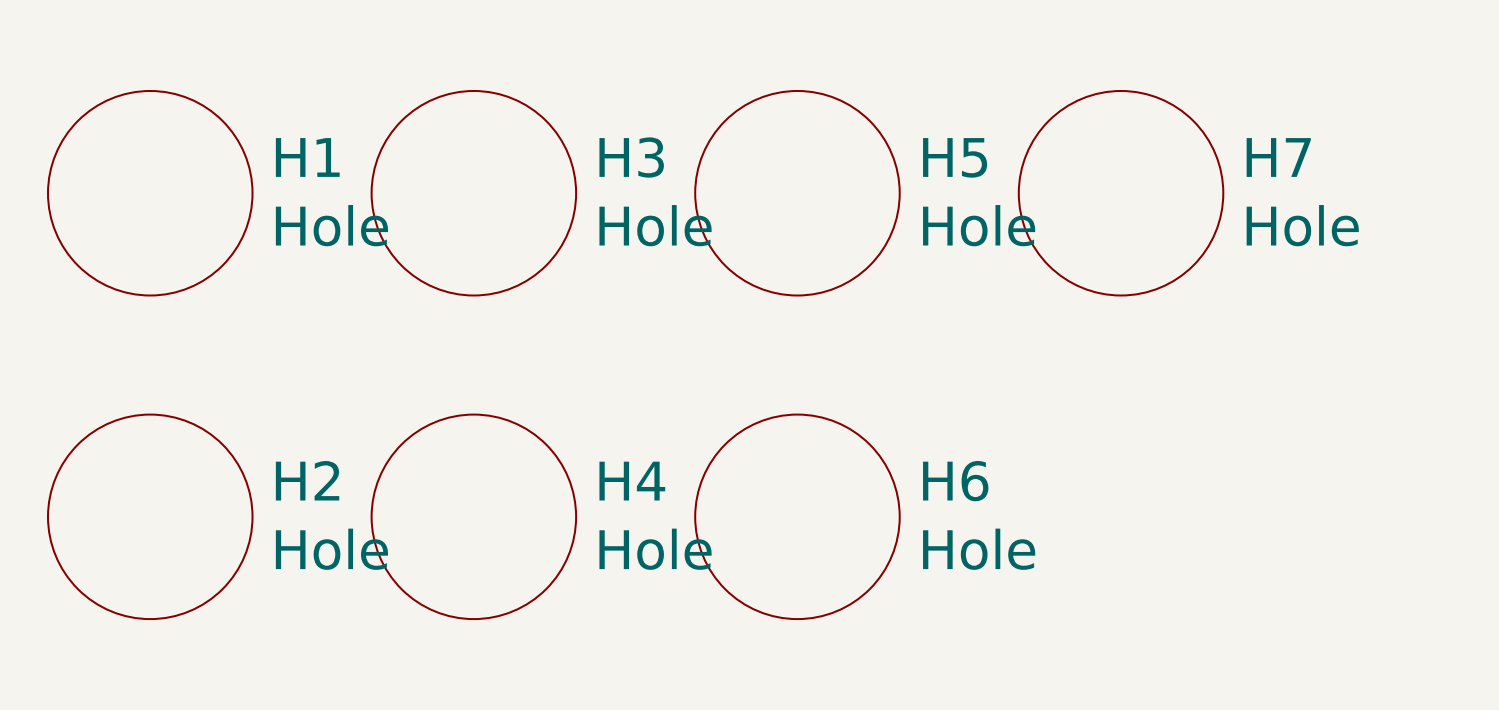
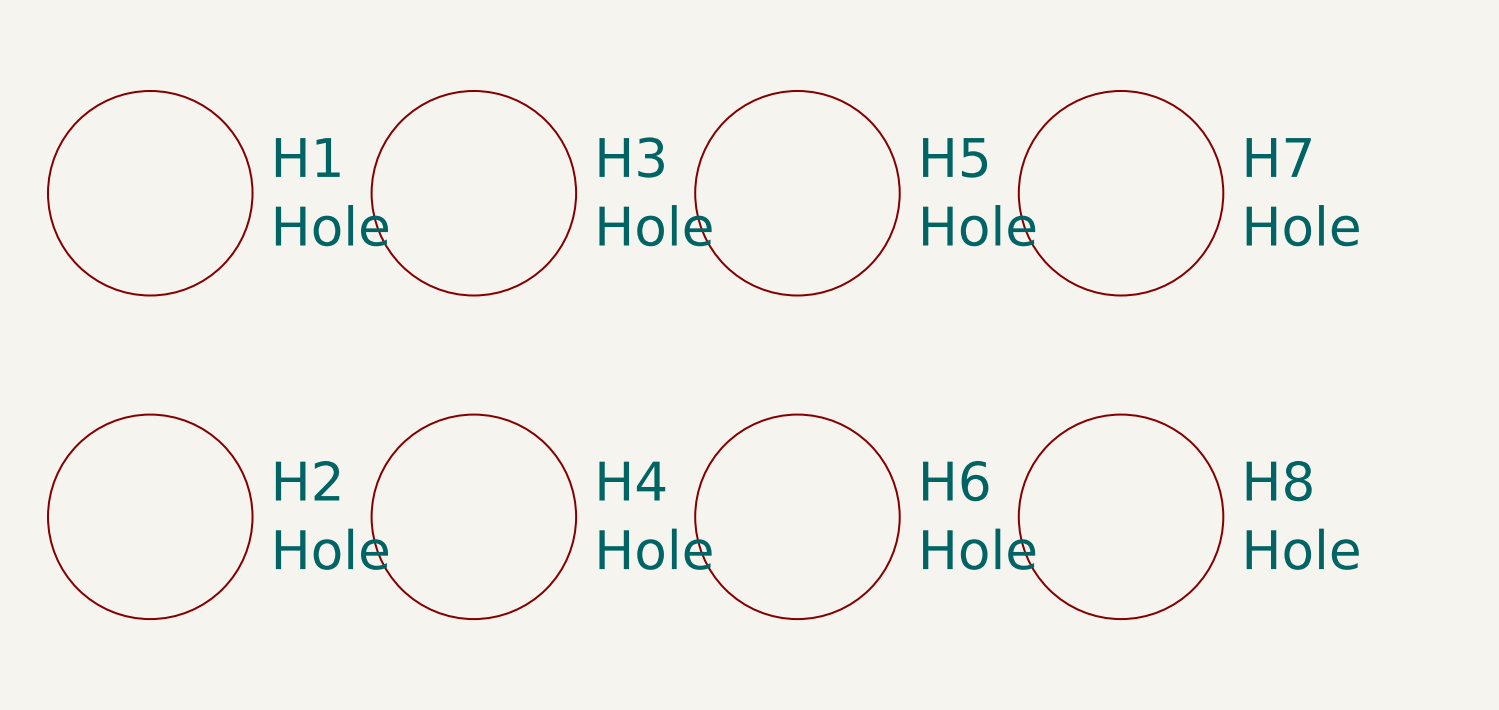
H8: none -> Hole (1121, 516)

